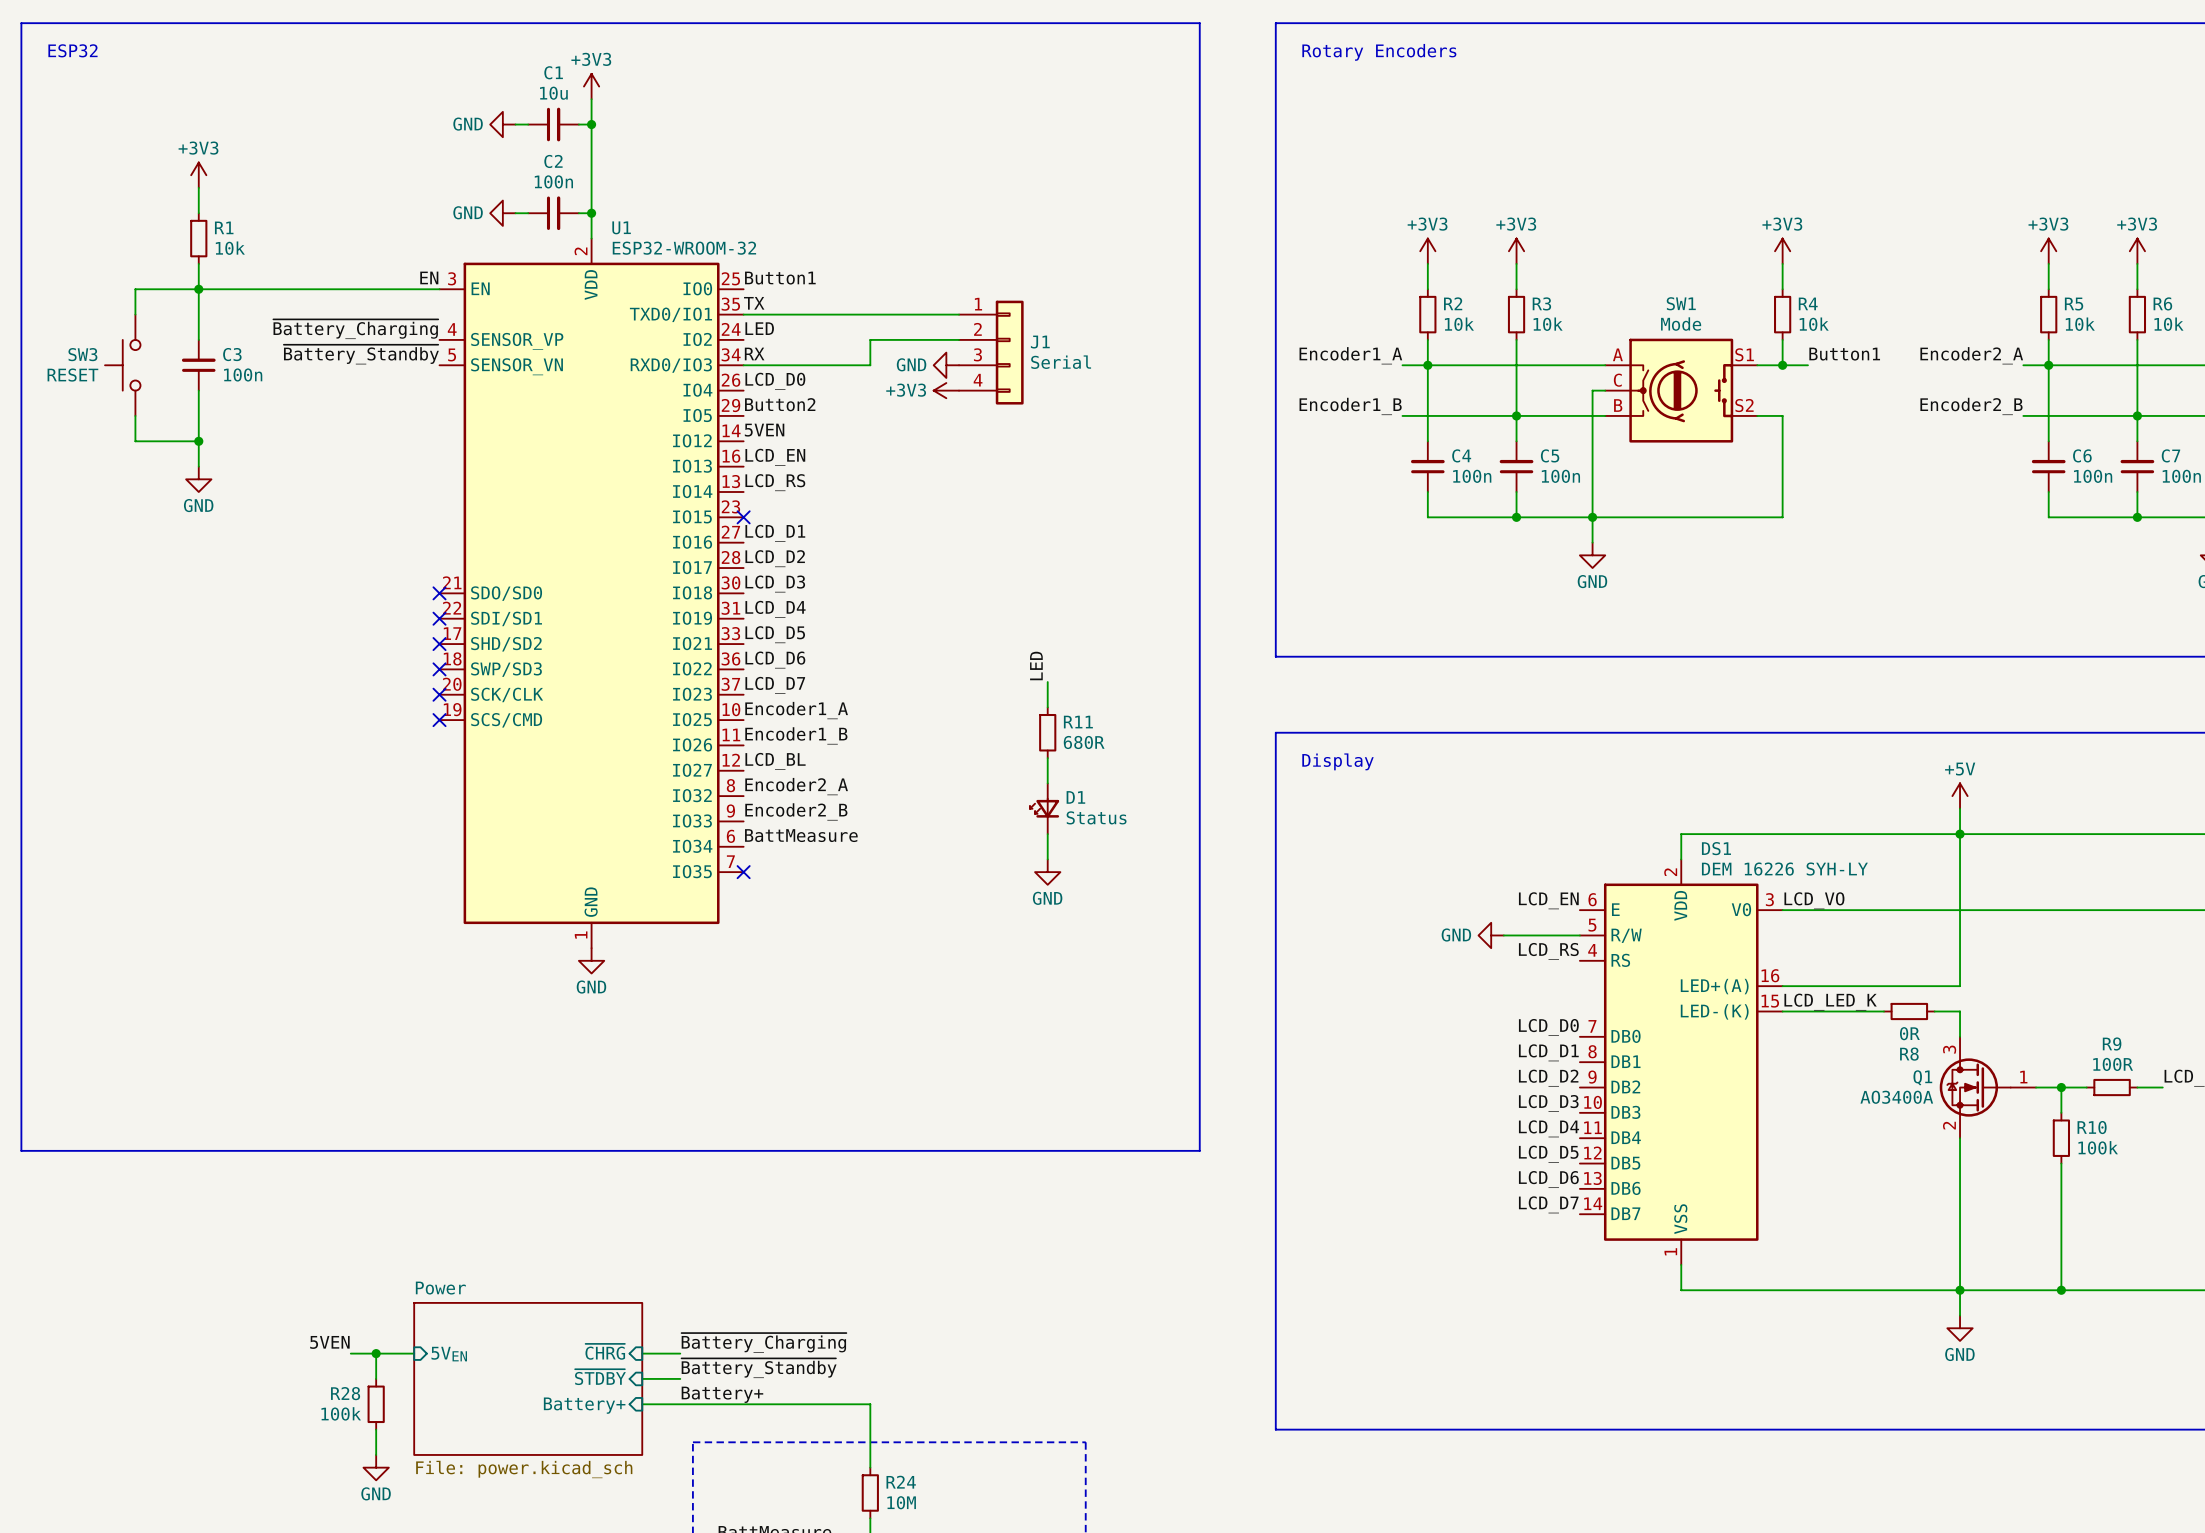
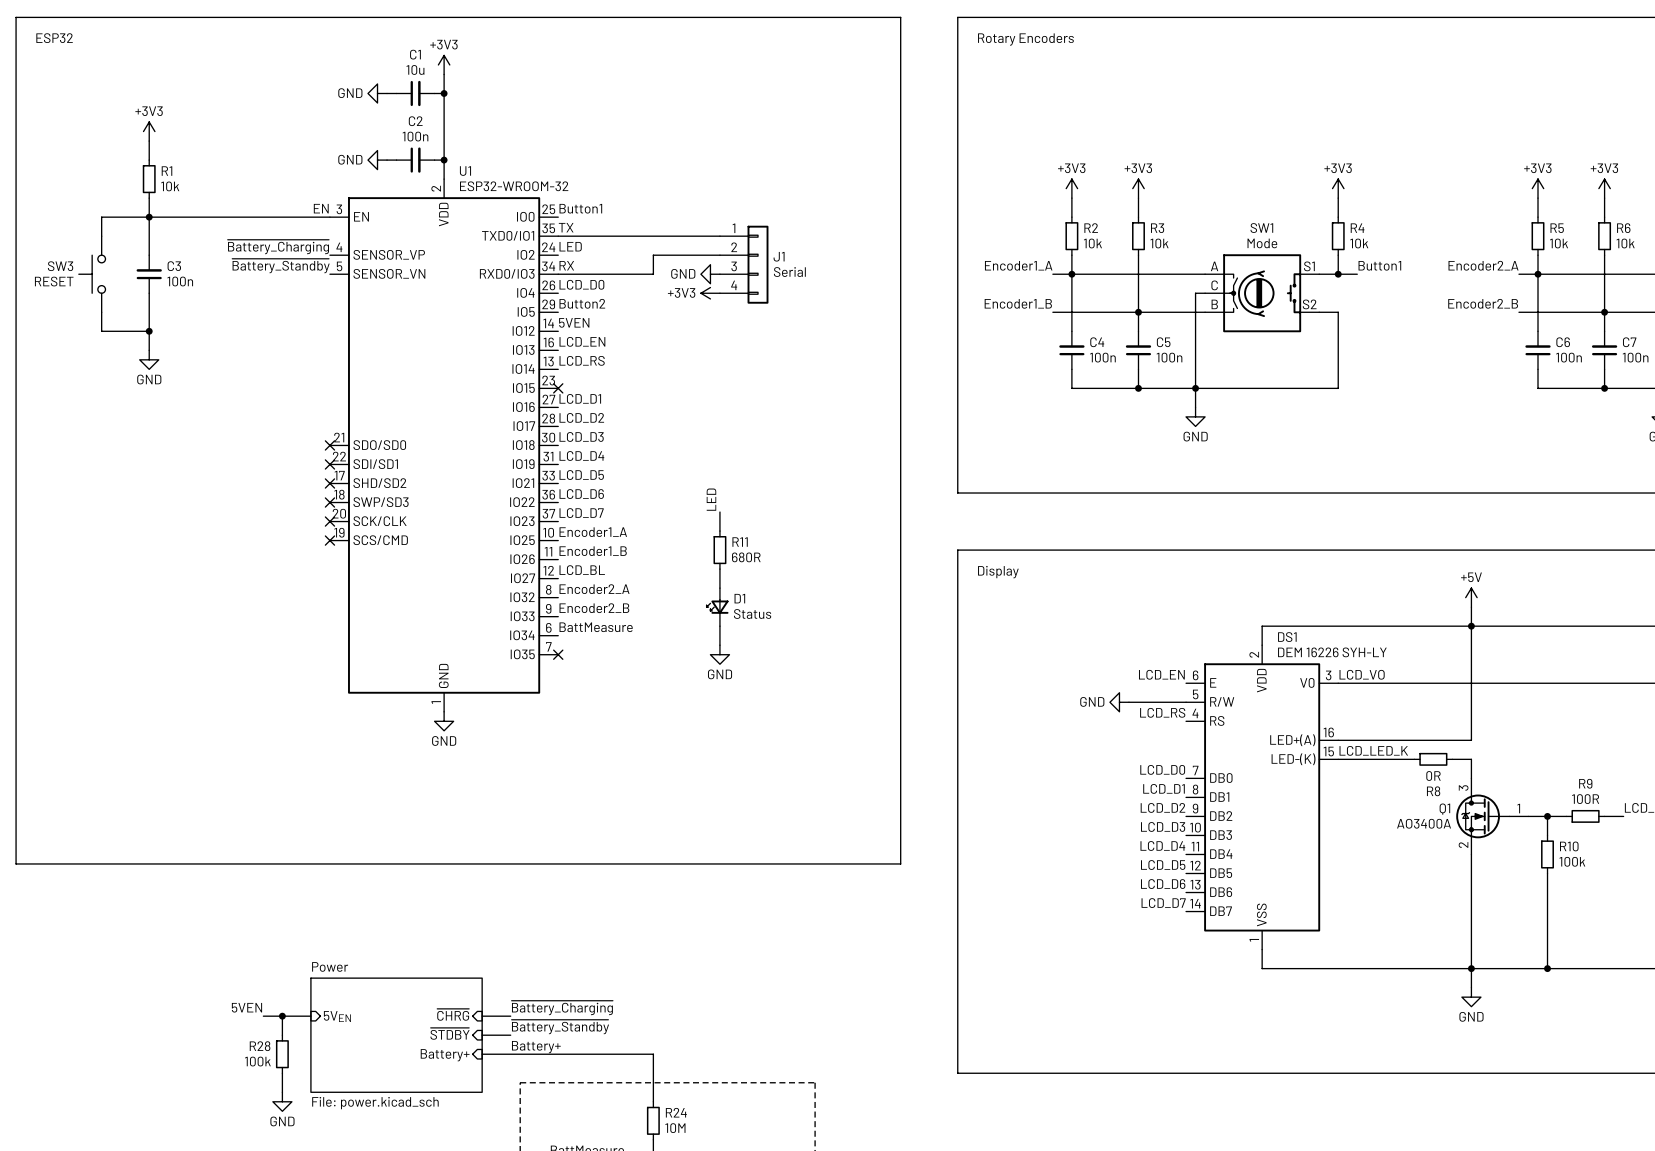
label position: LED (1036, 665) -> LED (711, 499)
wire: (1047, 682) (1047, 707) -> (719, 512) (719, 531)
R11 position: (1047, 732) -> (719, 550)
wire: (1047, 758) (1047, 783) -> (719, 569) (719, 588)
D1 position: (1044, 808) -> (717, 607)
wire: (1047, 834) (1047, 859) -> (719, 626) (719, 645)
power symbol position: GND (1047, 872) -> GND (719, 654)

